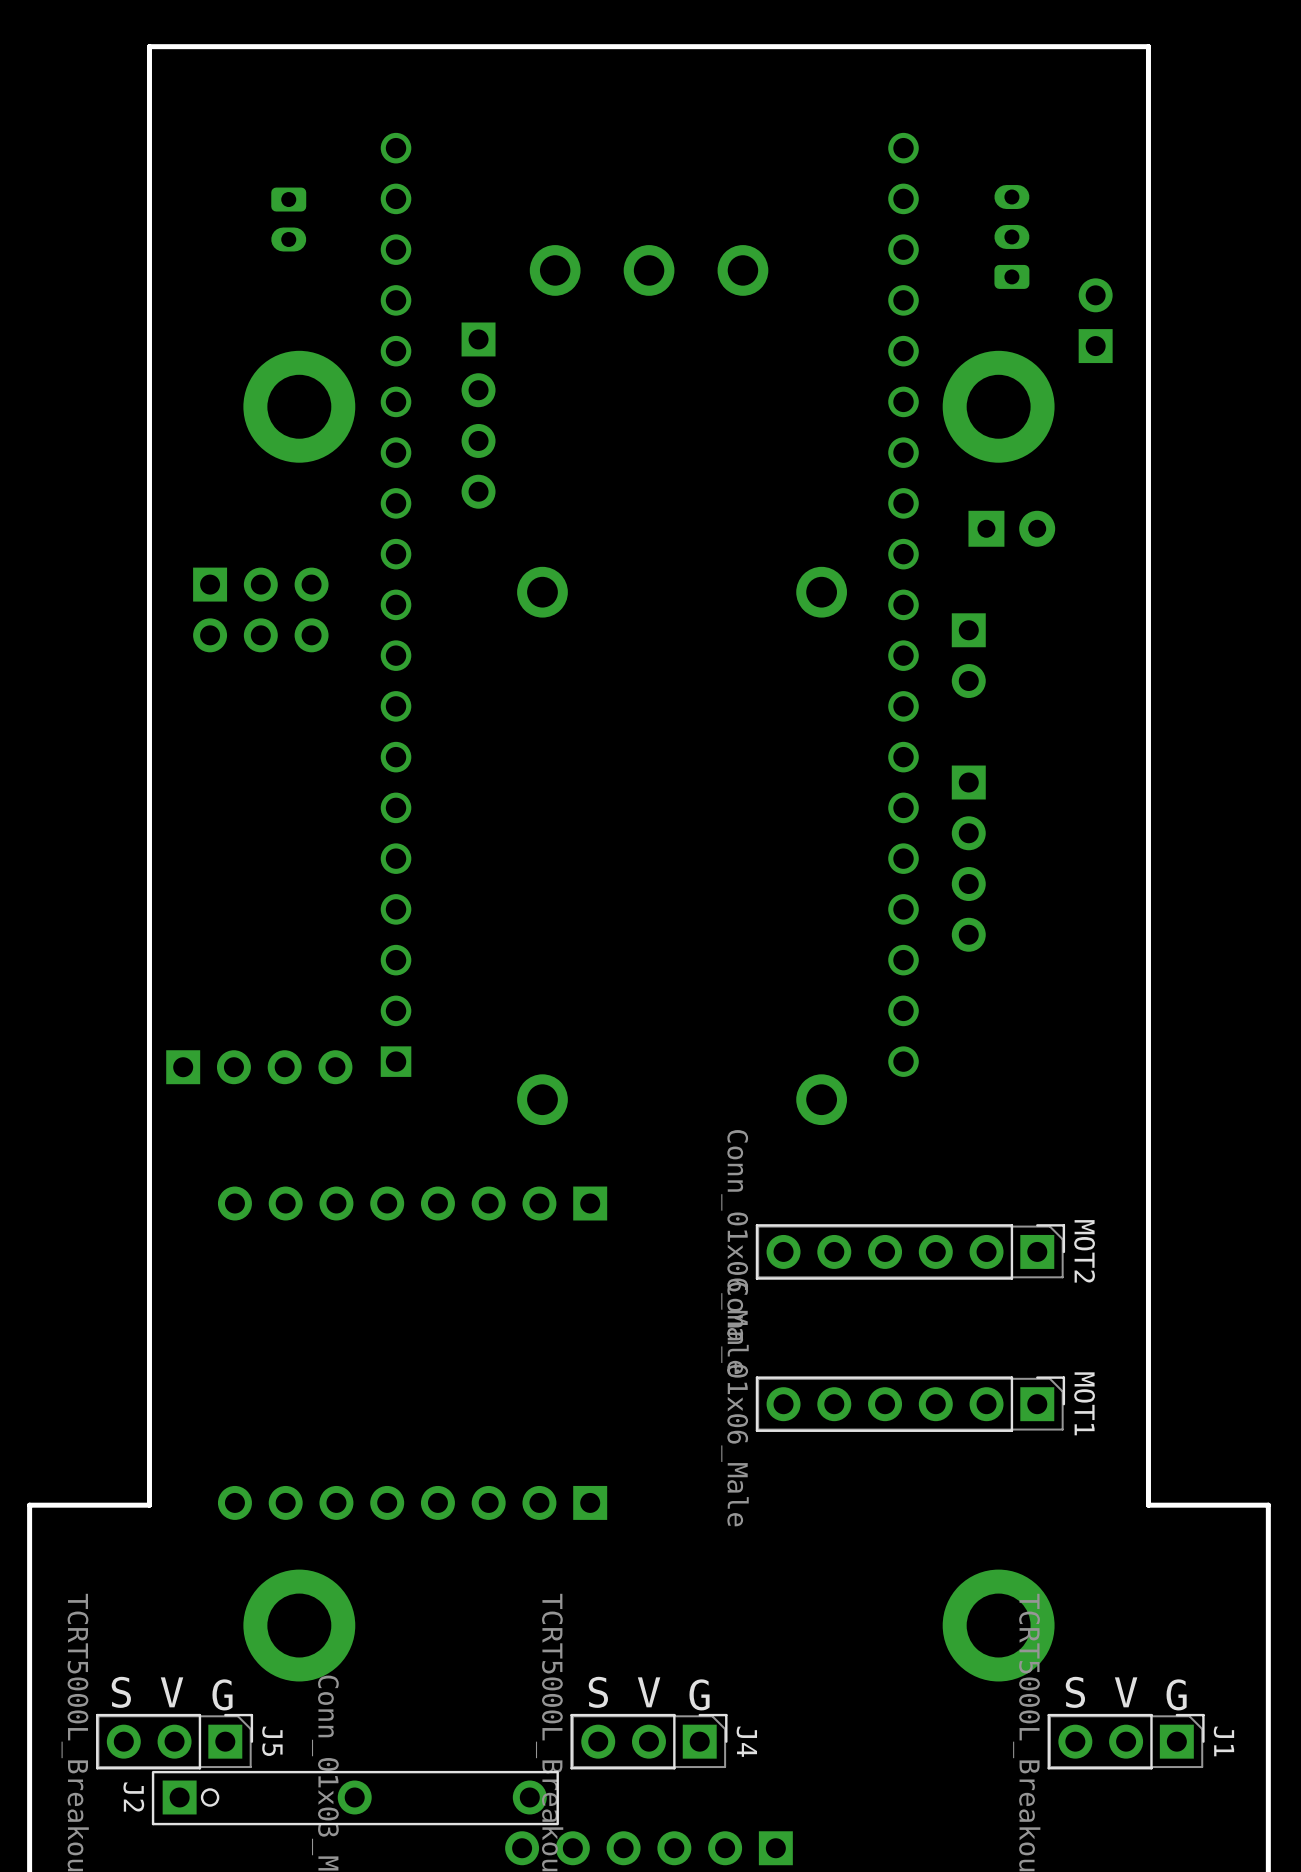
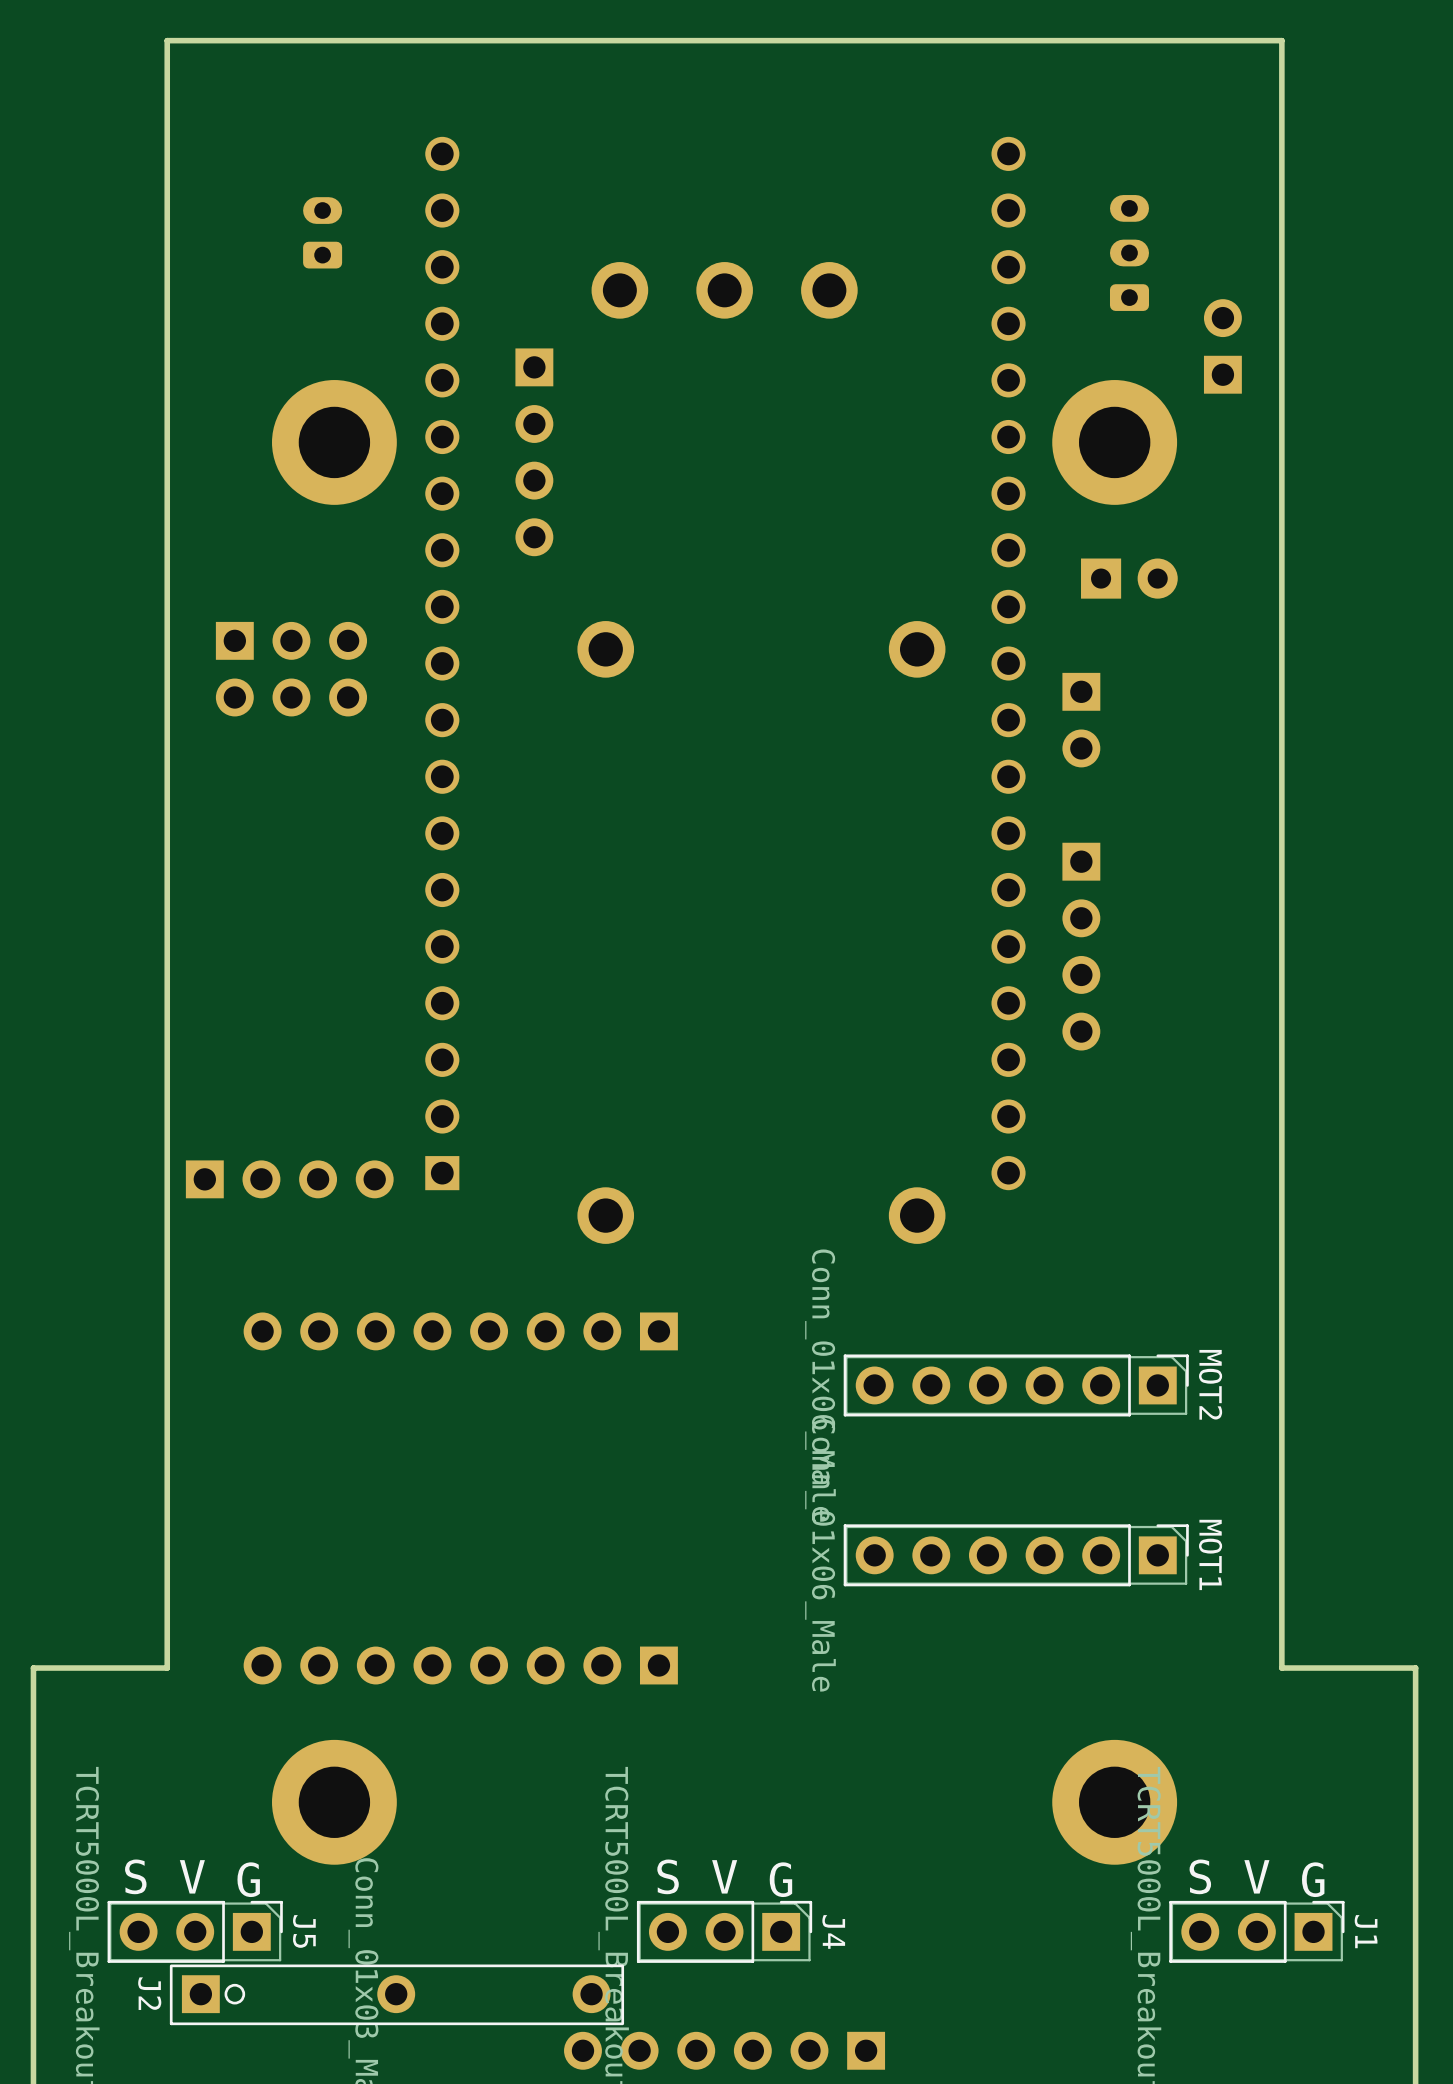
part rotation: 0° (288, 219) -> 180° (322, 232)

